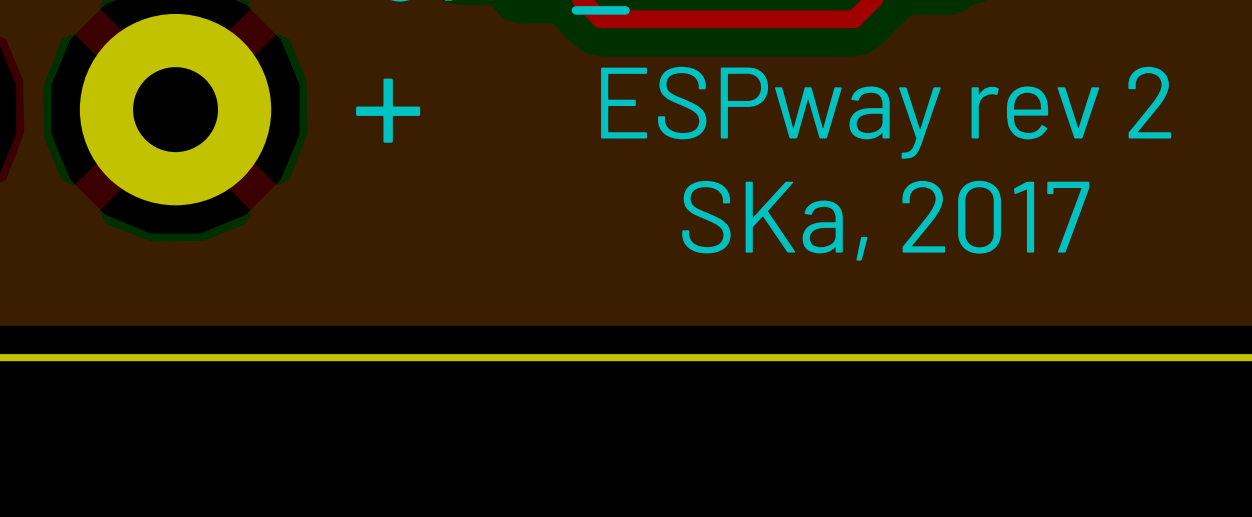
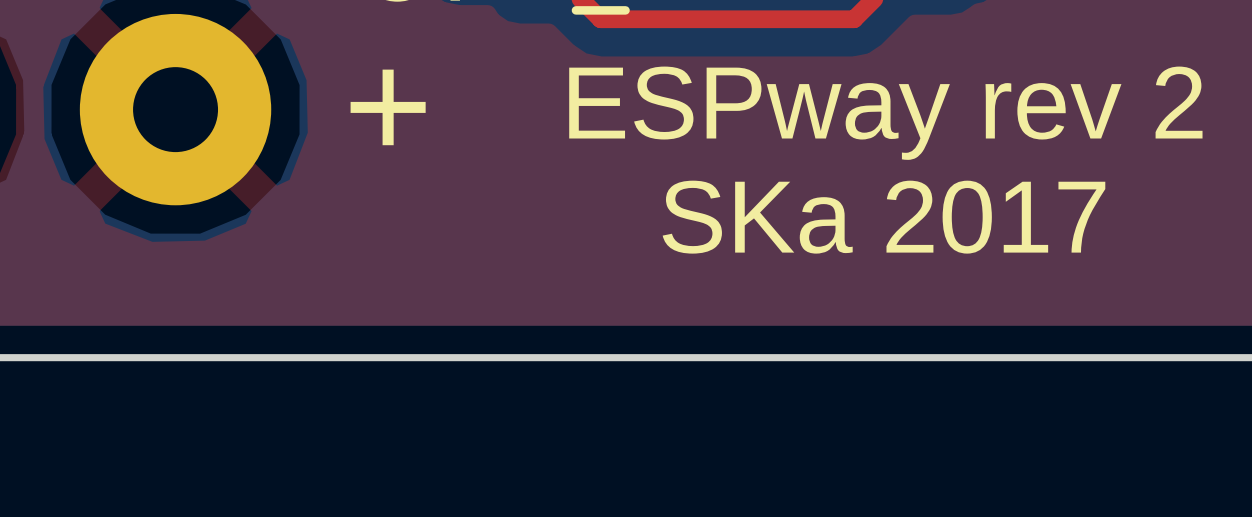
text: SKa, 2017 (885, 220) -> SKa 2017 (883, 217)

